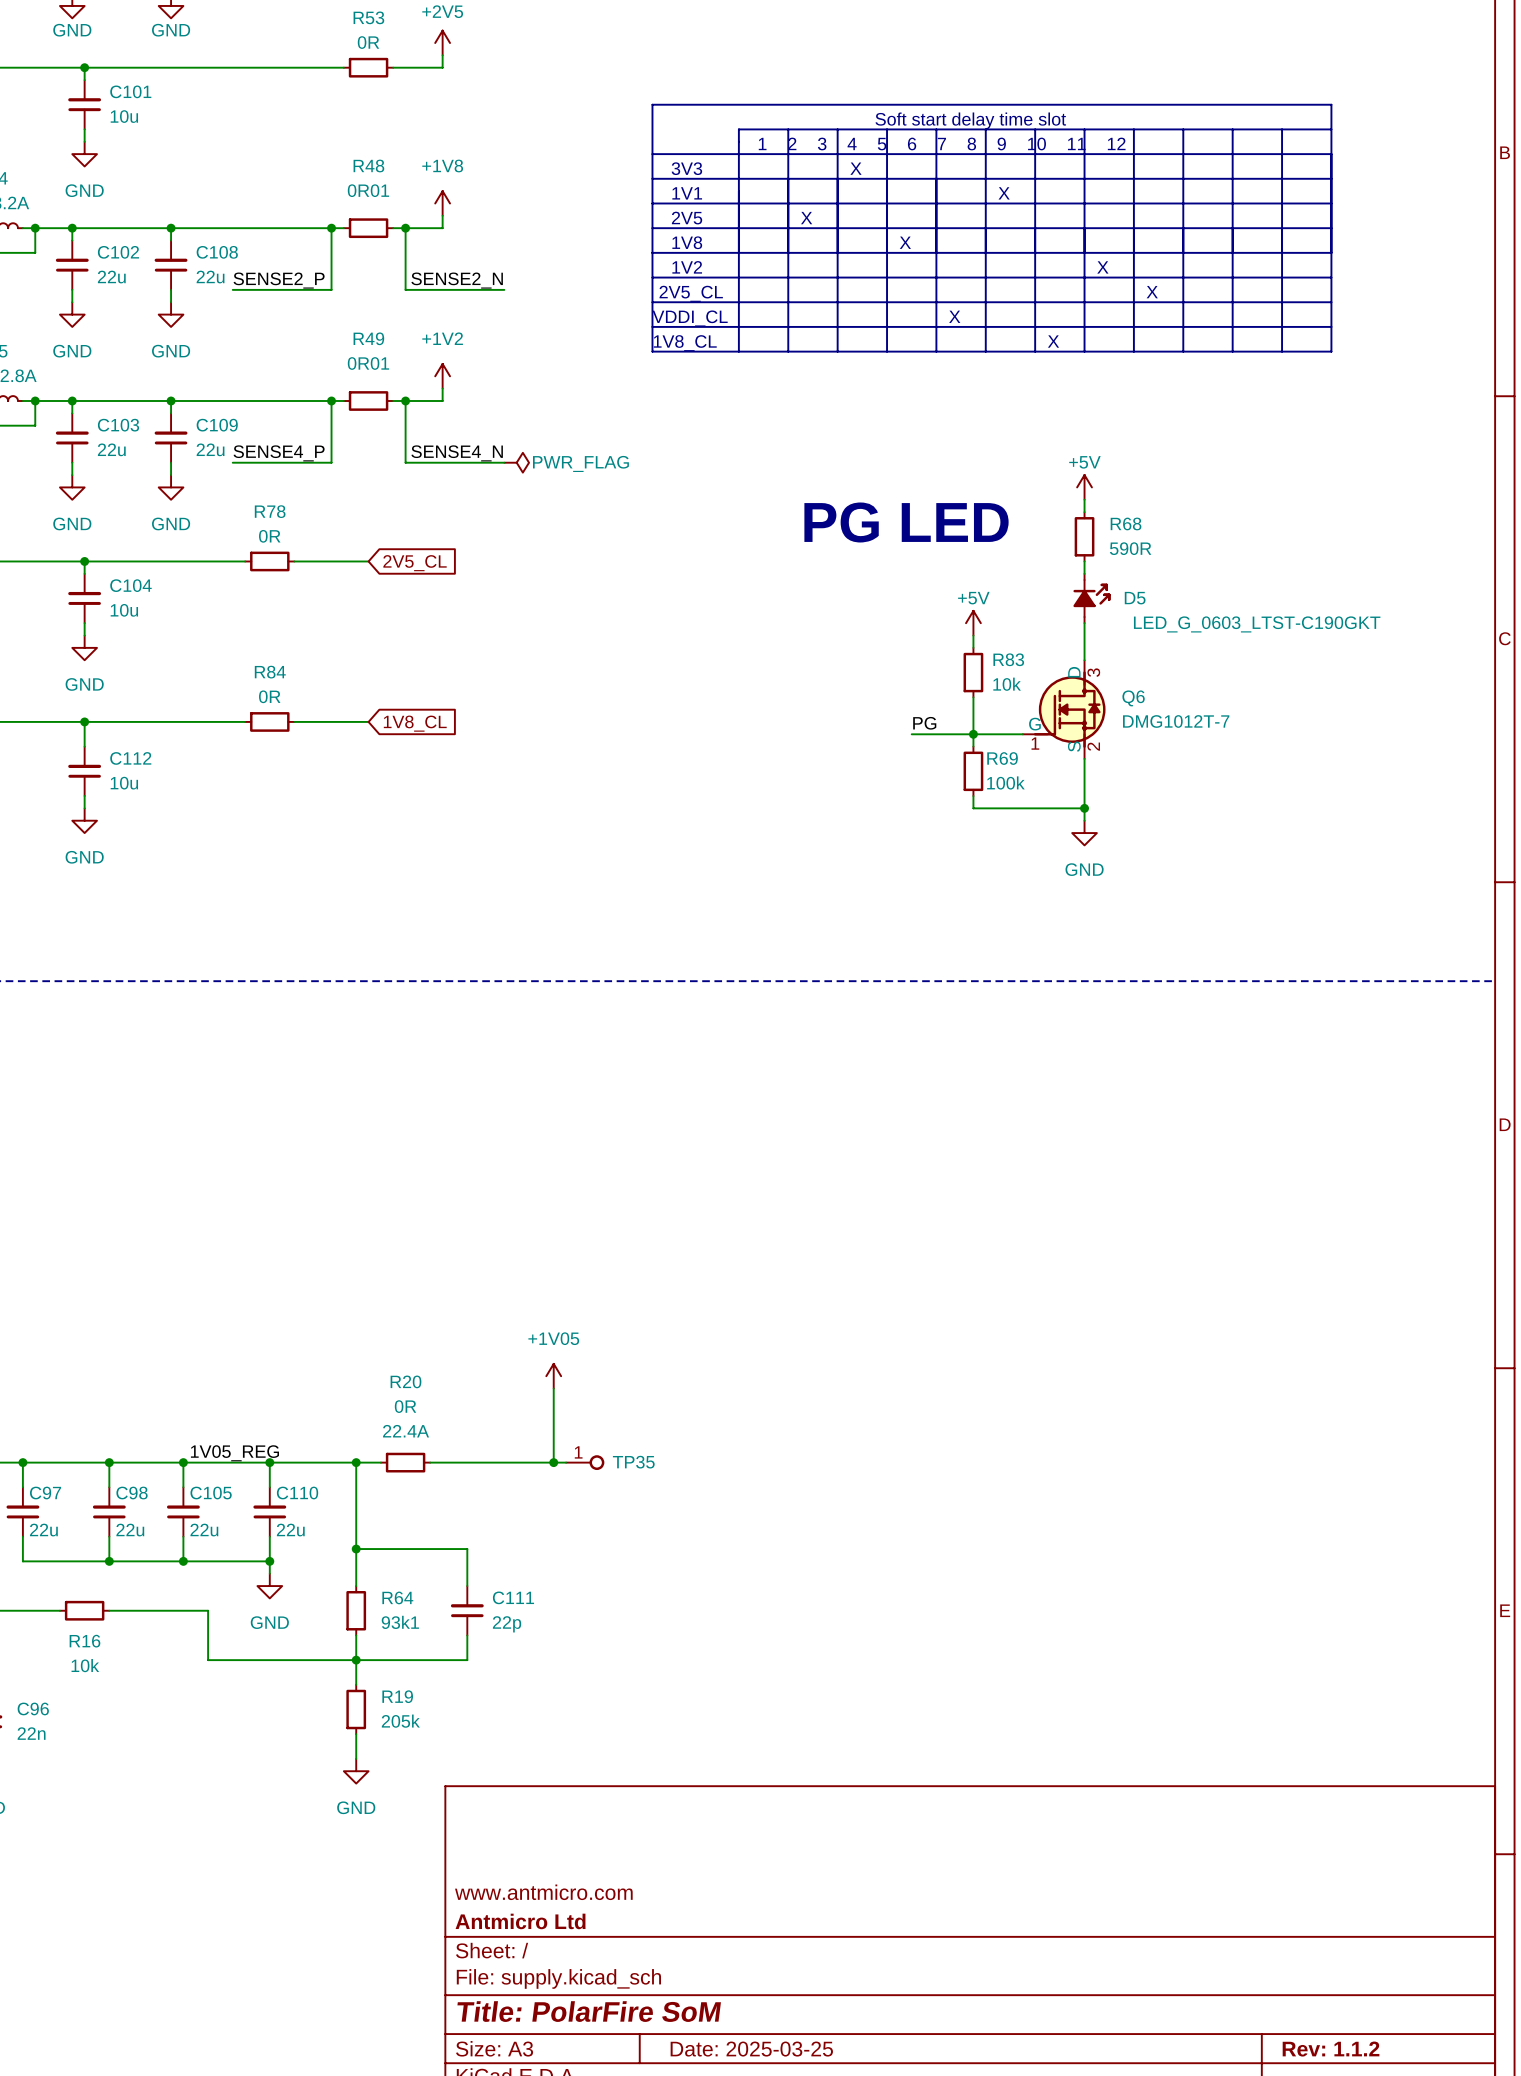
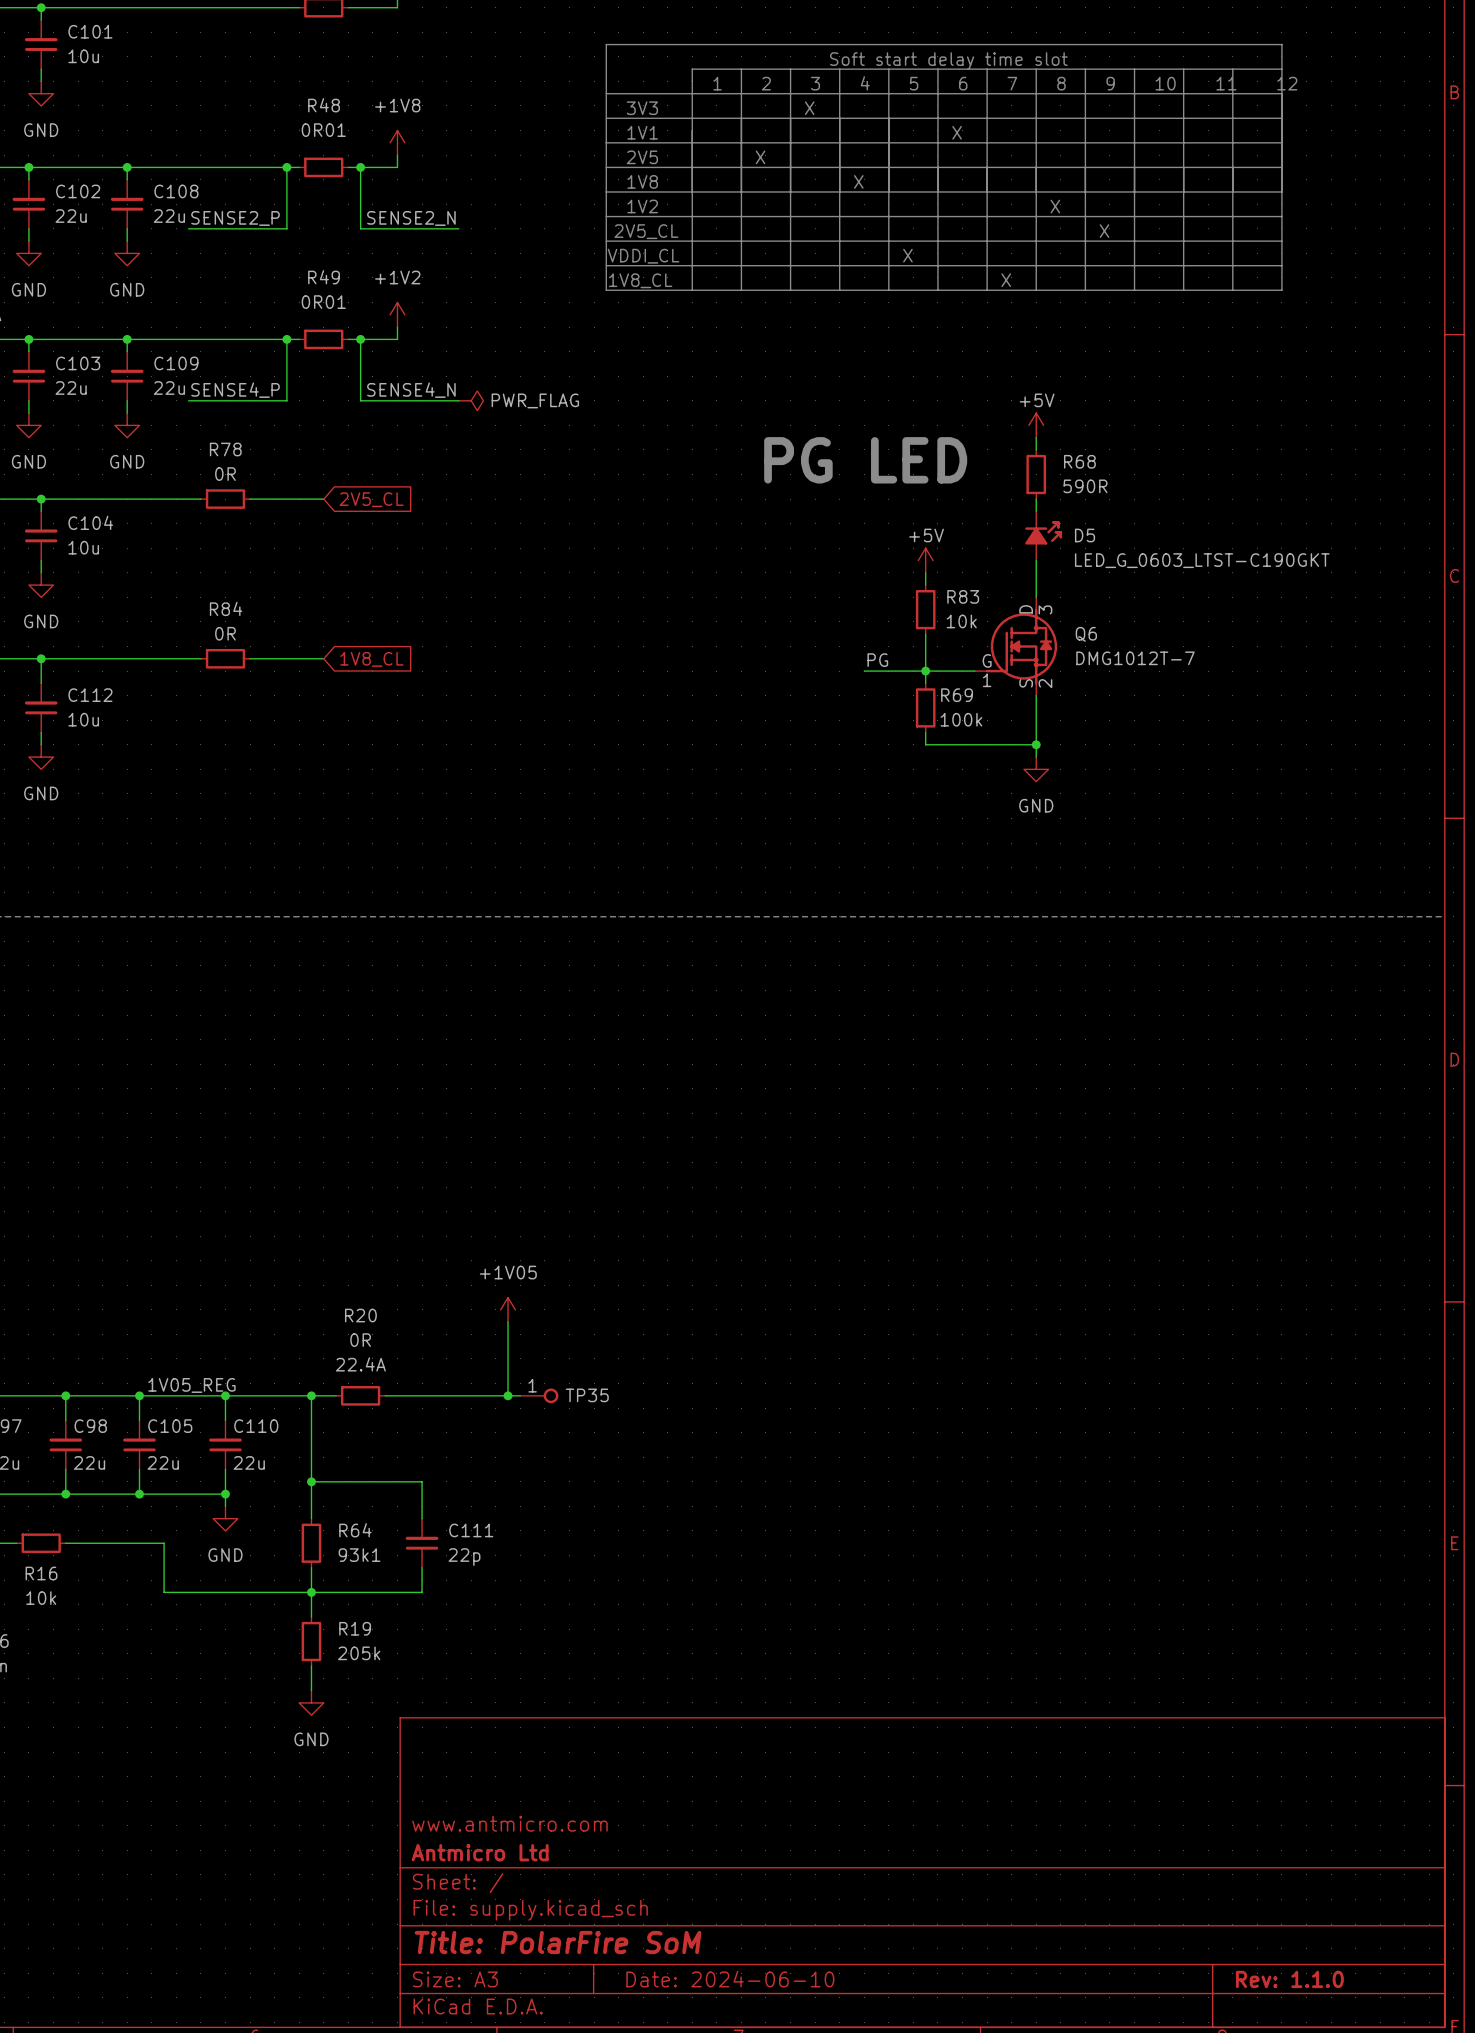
title block: Date: 2025-03-25 (751, 2049) -> Date: 2024-06-10 (730, 1979)
title block: Rev: 1.1.2 (1331, 2049) -> Rev: 1.1.0 (1289, 1979)

